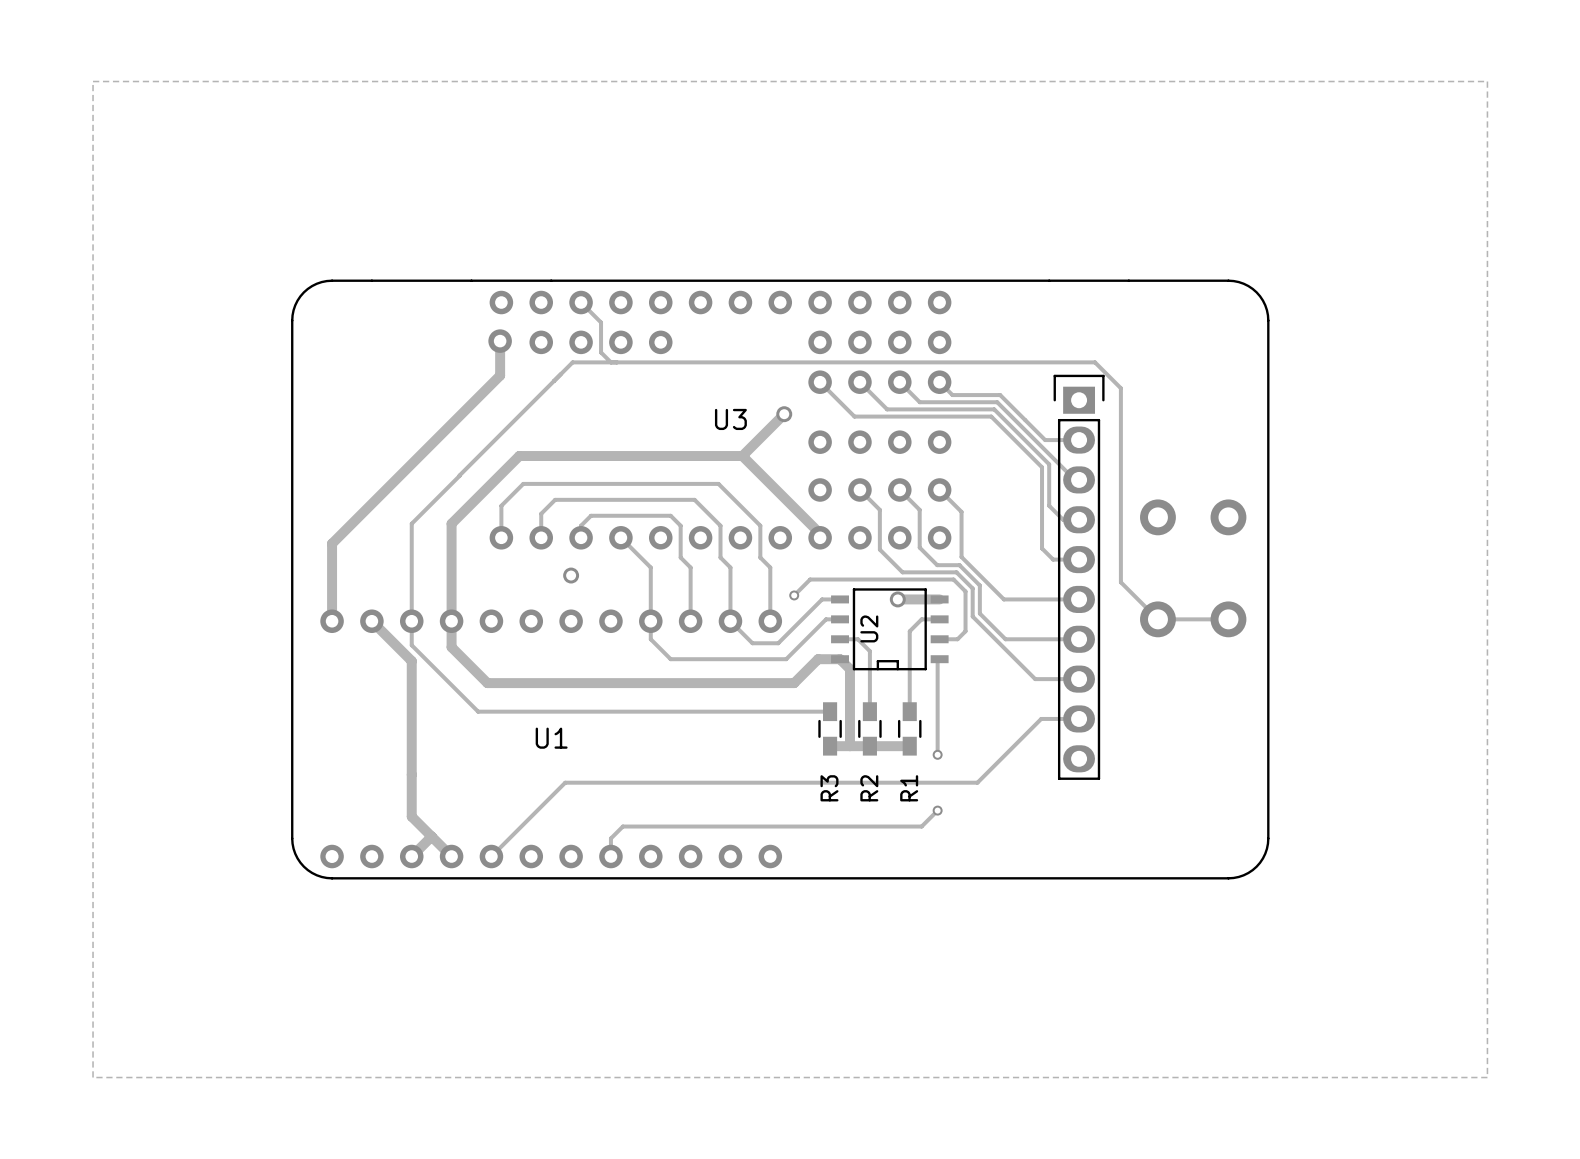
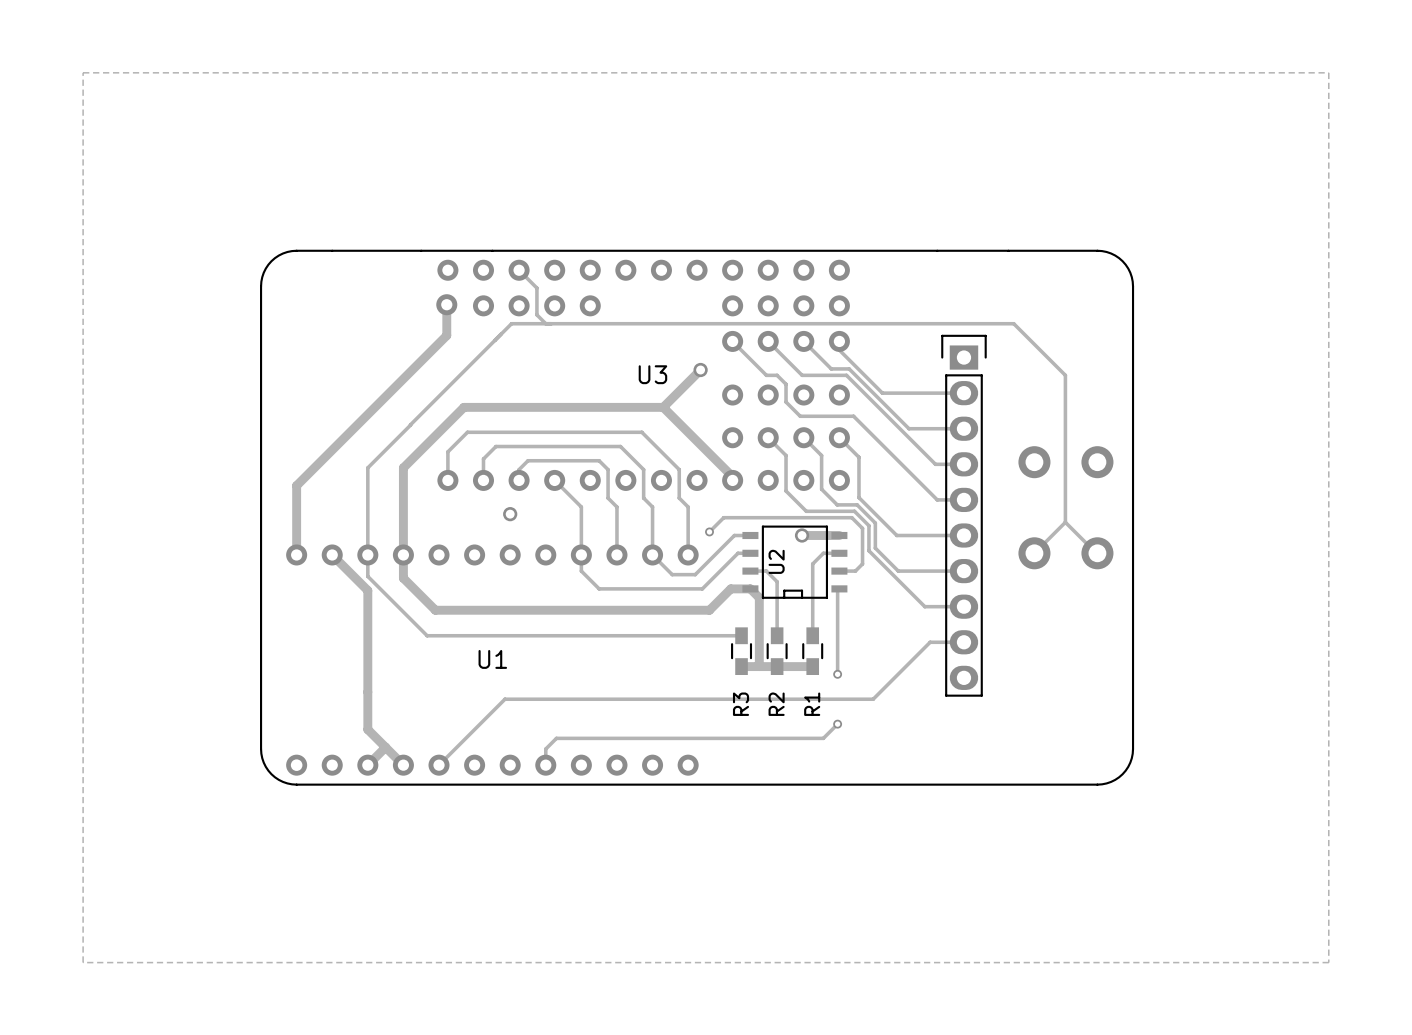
track: (1095, 362) (1120, 388) (1120, 582) (1157, 619) (1227, 619) -> (978, 323) (1013, 323) (1065, 375) (1065, 522)
track: (939, 382) (952, 395) (1000, 395) (1045, 440) -> (839, 350) (882, 393) (933, 393)
track: (919, 402) (997, 402) (1074, 479) -> (821, 359) (831, 368) (849, 368) (908, 428) (960, 428)
track: (887, 409) (994, 409) (1049, 464) (1049, 505) (1063, 519) -> (792, 365) (802, 375) (846, 375) (935, 464) (949, 464)
track: (854, 416) (991, 416) (1042, 467) (1042, 548) (1053, 559) -> (763, 372) (766, 375) (777, 375) (786, 384) (786, 402) (800, 416) (853, 416) (937, 499) (940, 499)
track: none -> (1065, 522) (1096, 553)
track: none -> (1065, 522) (1034, 553)

